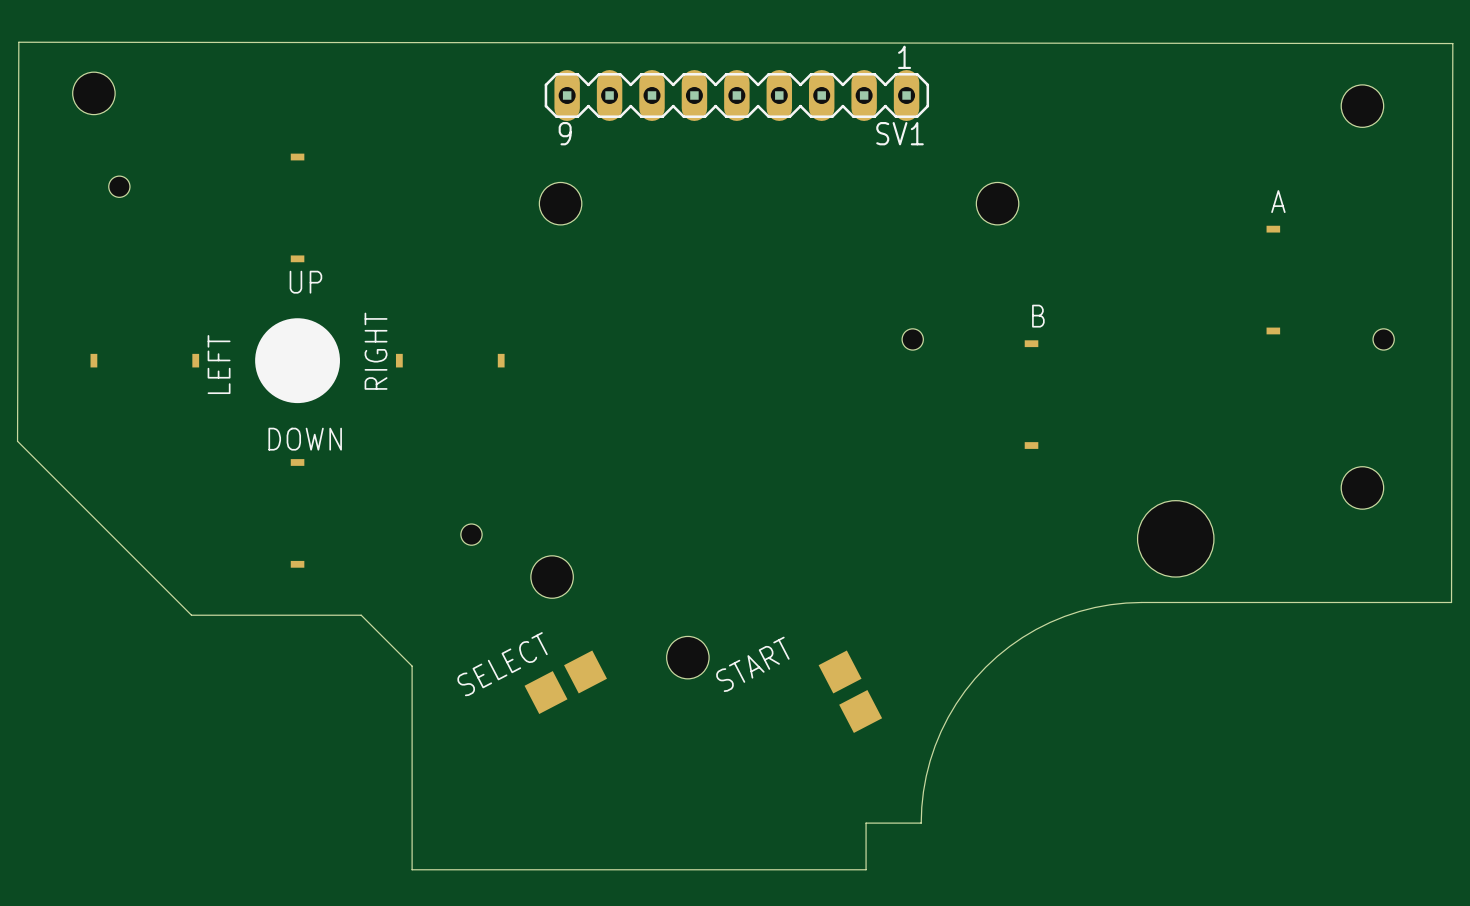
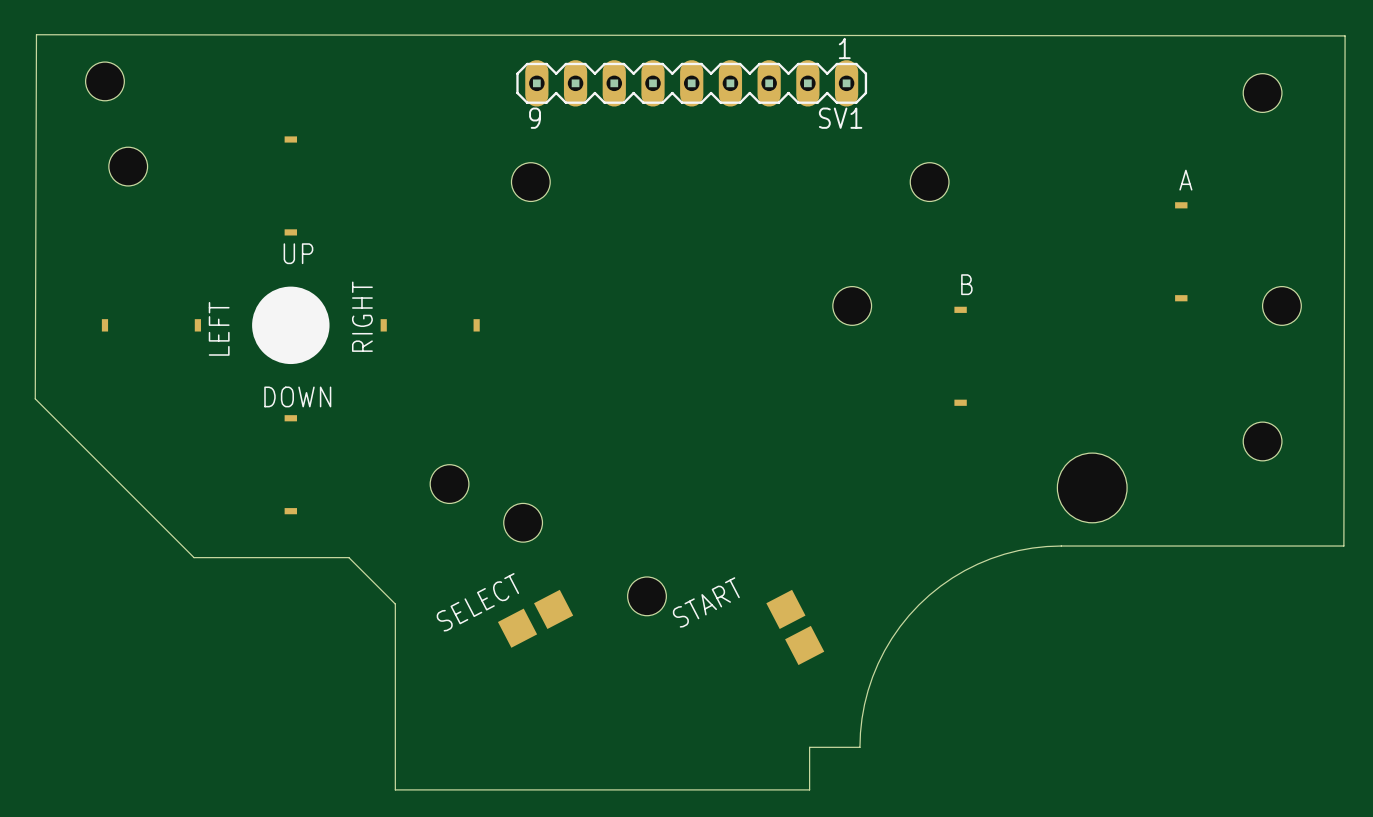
hole size: [108, 176, 130, 198] -> [108, 147, 148, 186]
hole size: [902, 328, 924, 351] -> [832, 286, 872, 326]
hole size: [1373, 328, 1395, 351] -> [1262, 286, 1302, 326]
hole size: [460, 524, 483, 546] -> [430, 464, 469, 504]

